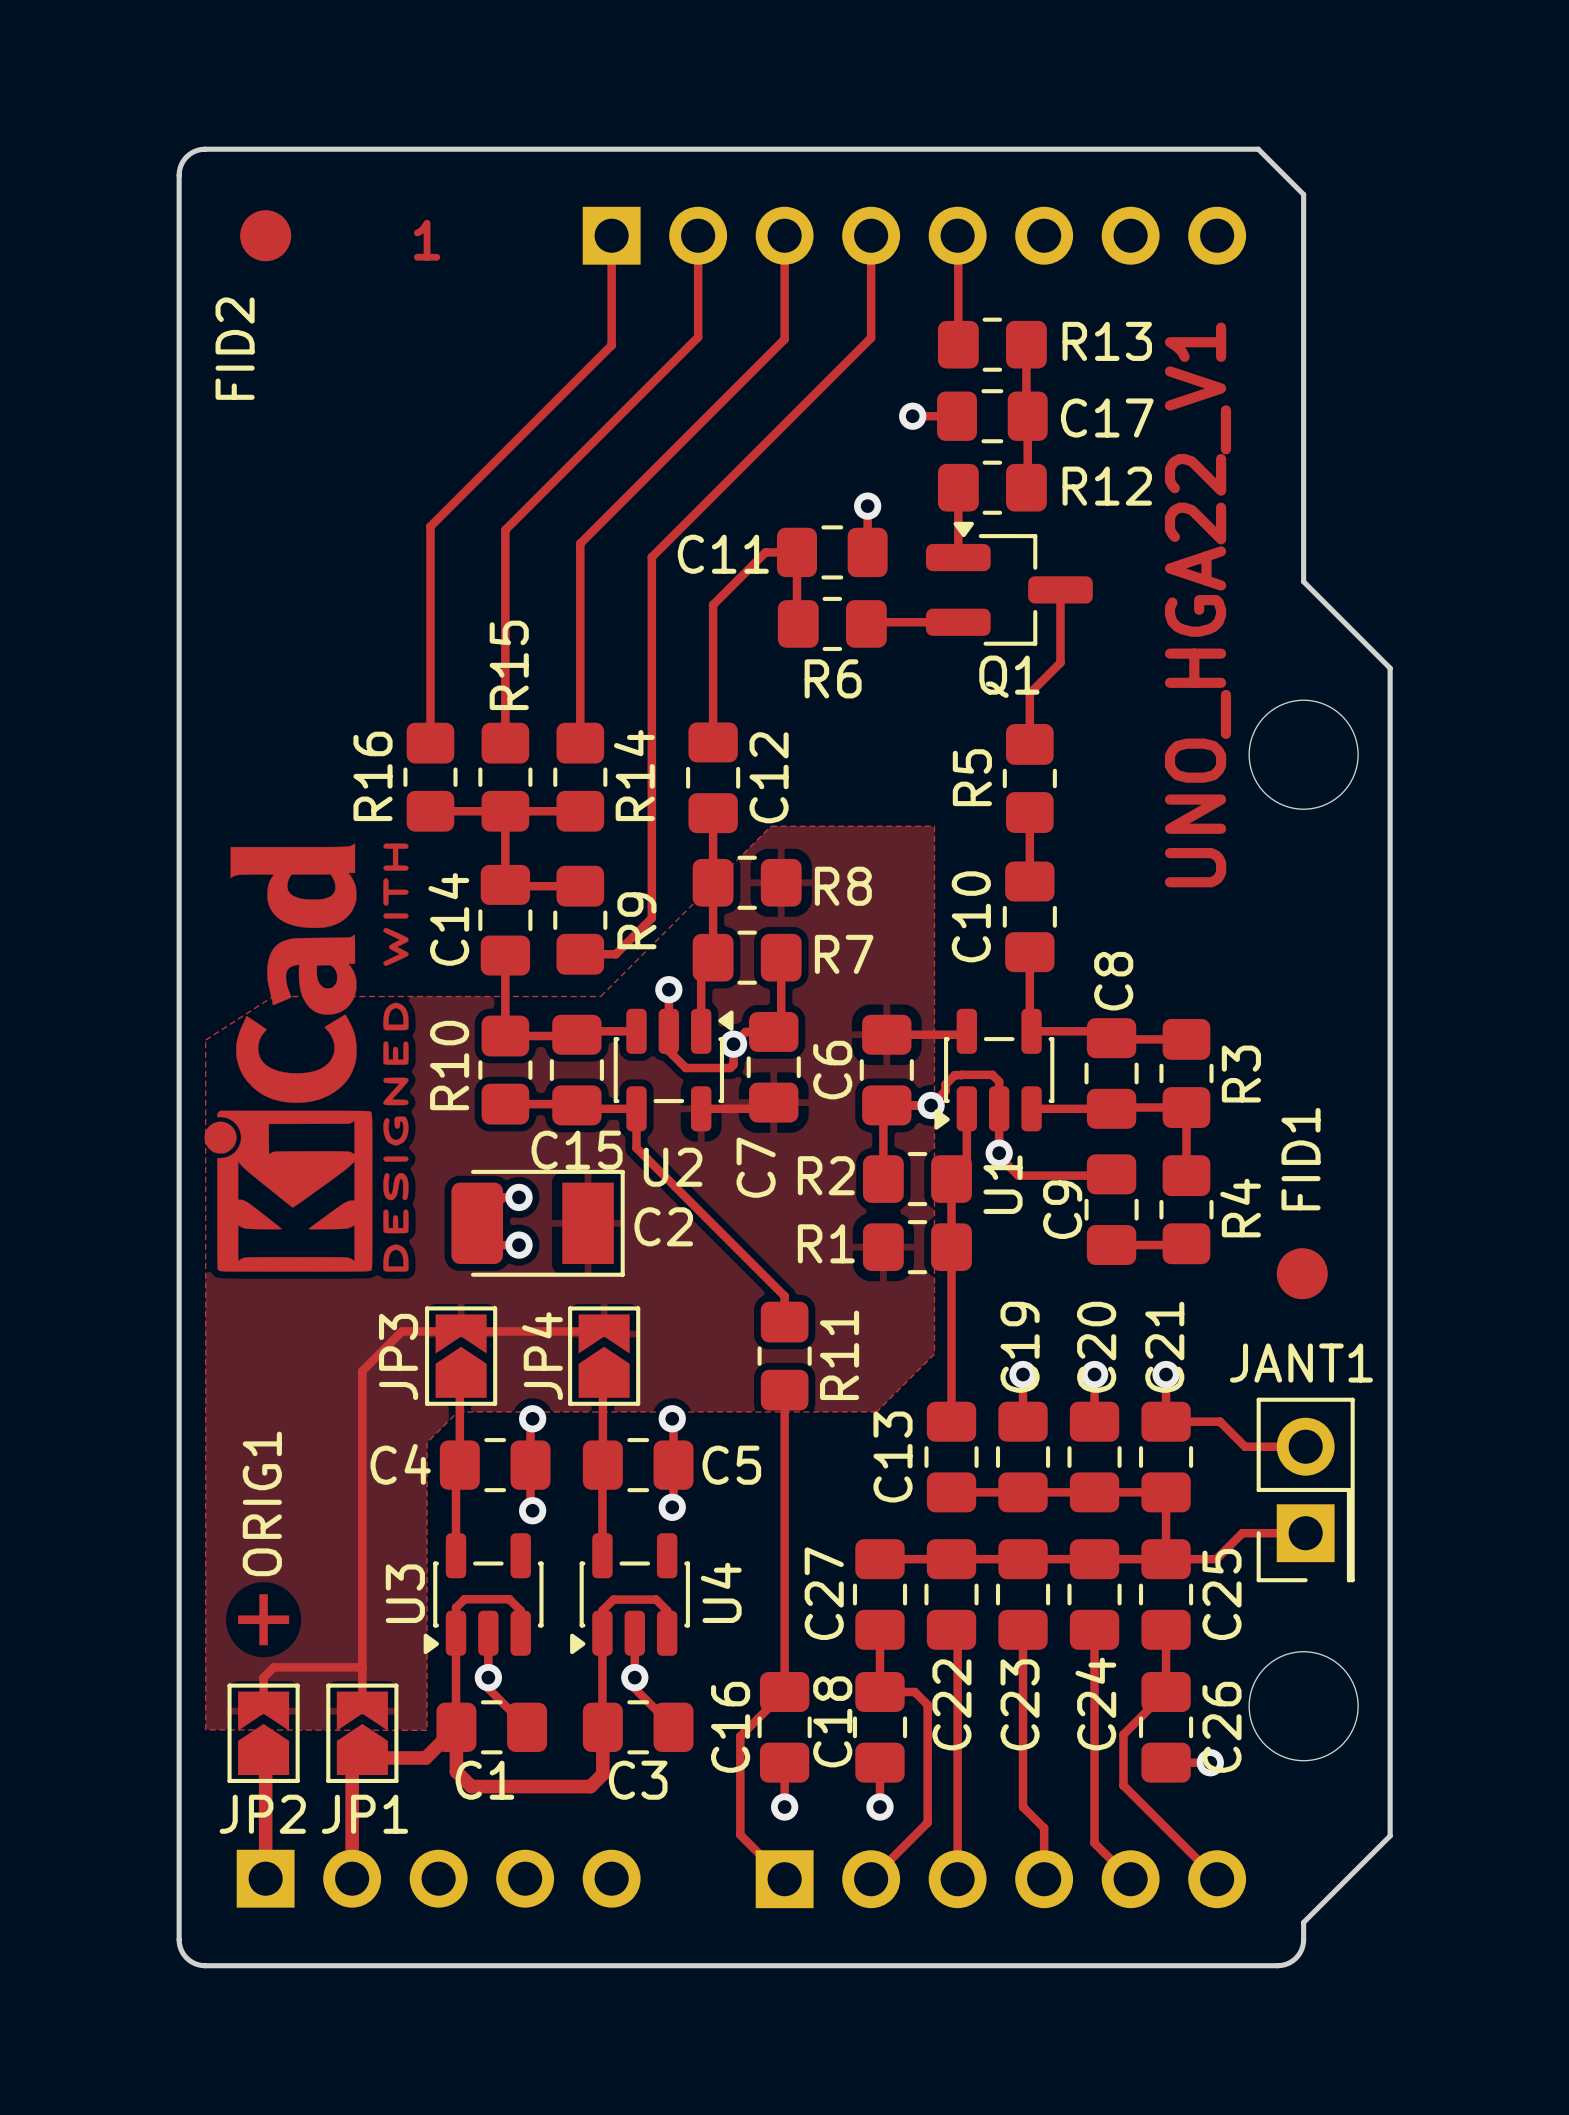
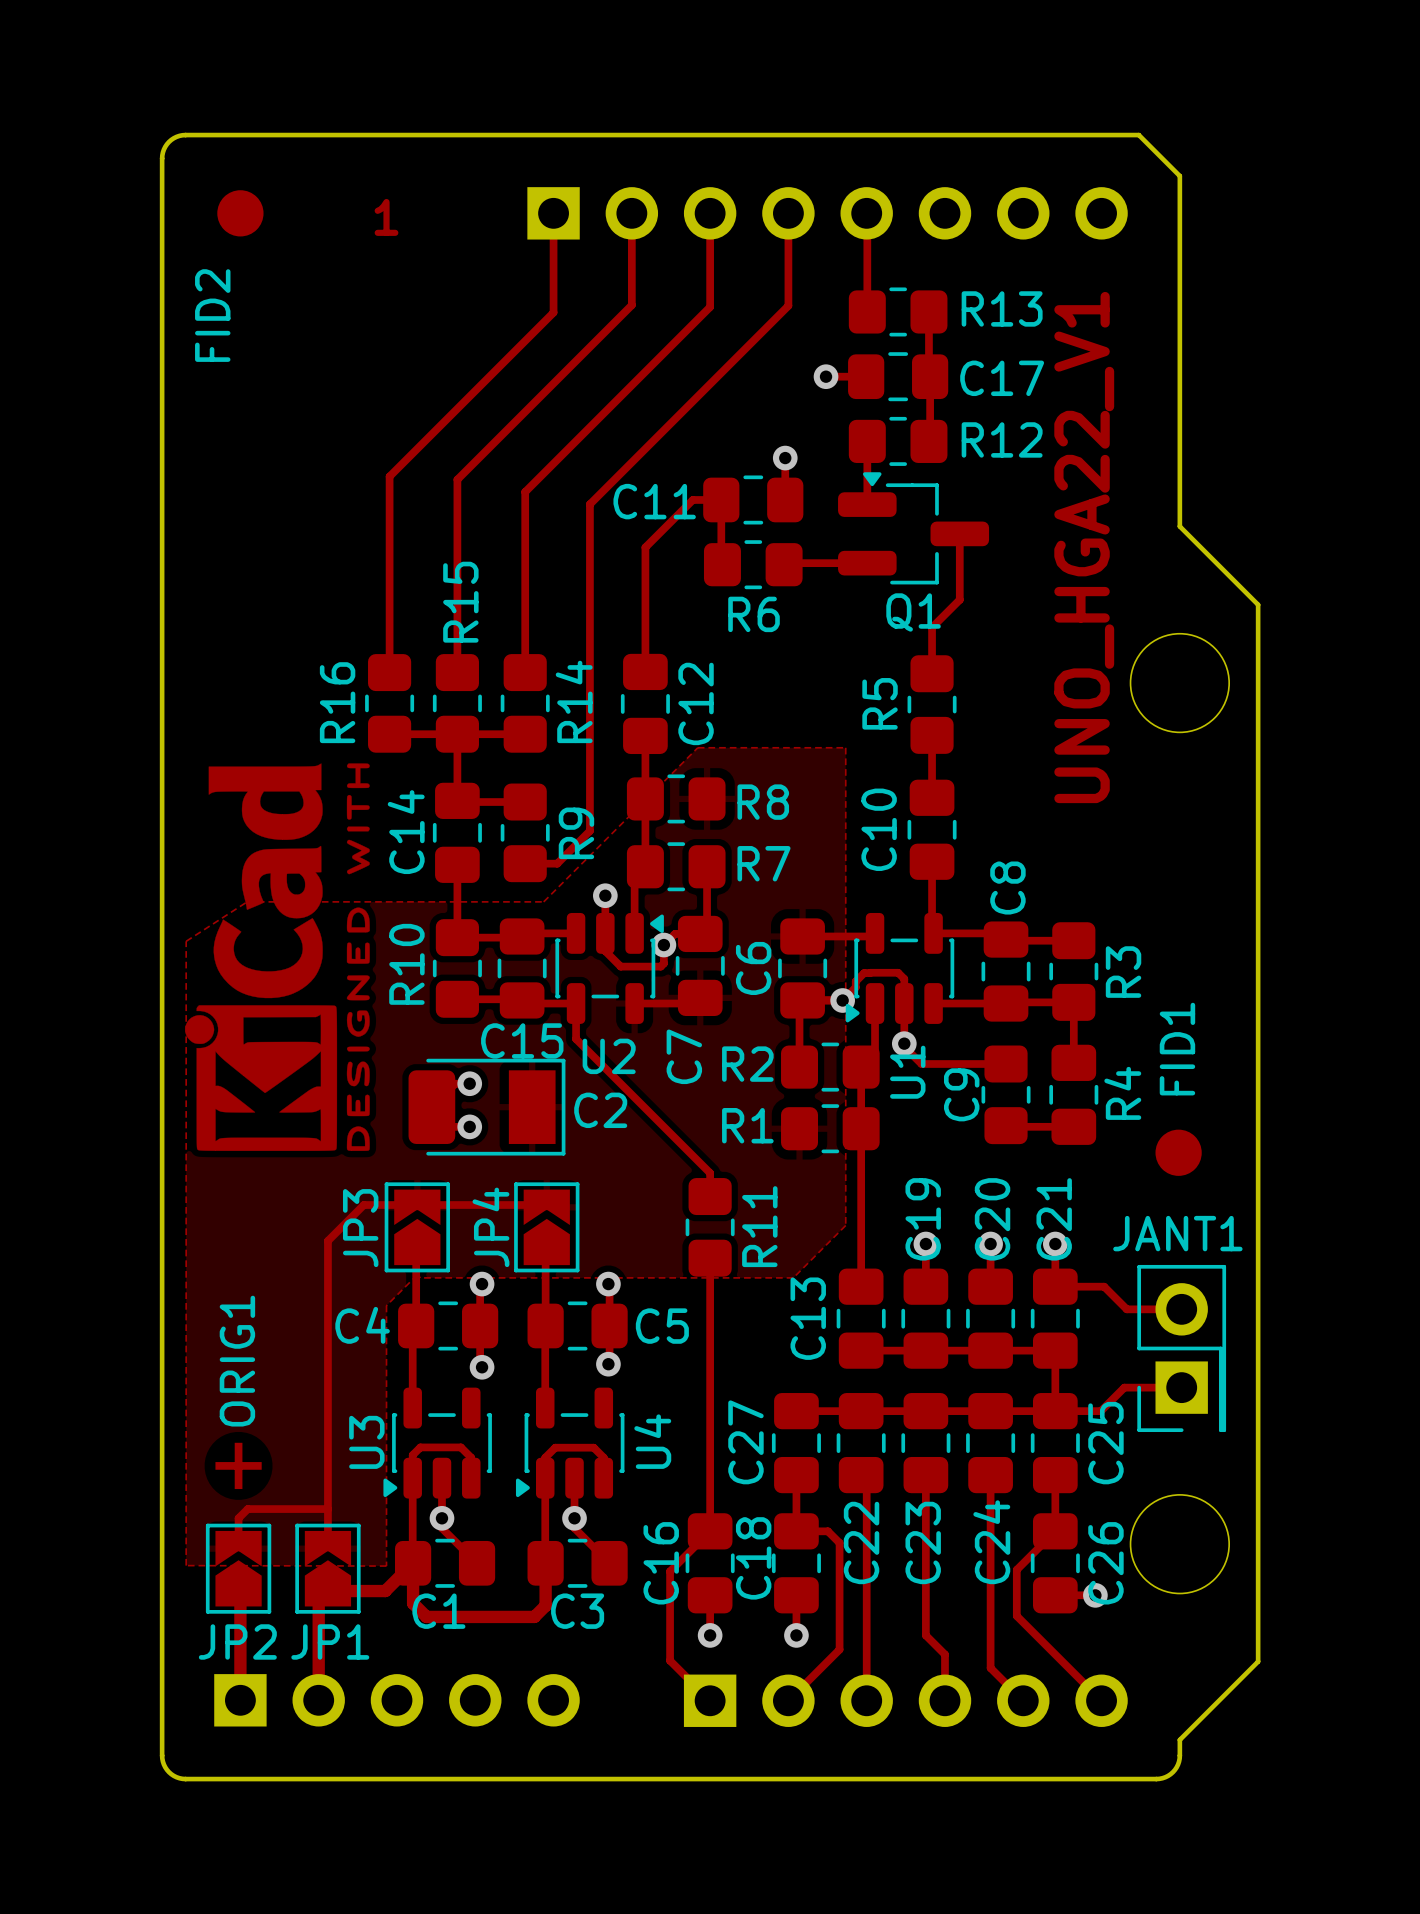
C9 position: (1111, 1209) -> (1073, 1094)
R4 position: (1186, 1209) -> (1006, 1094)

